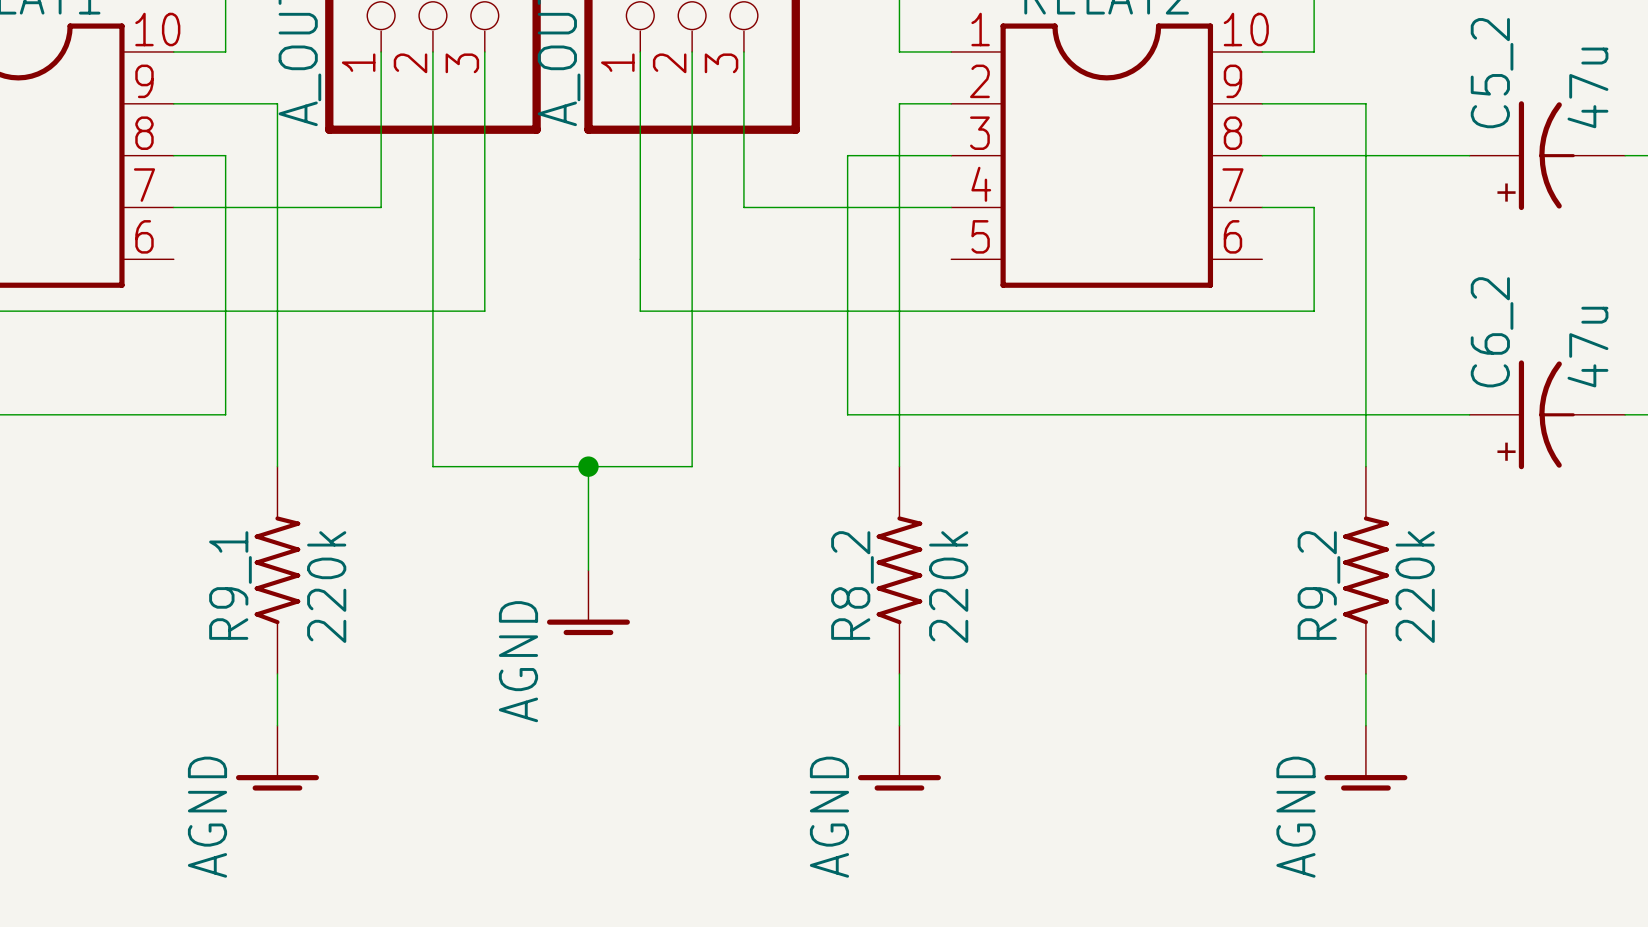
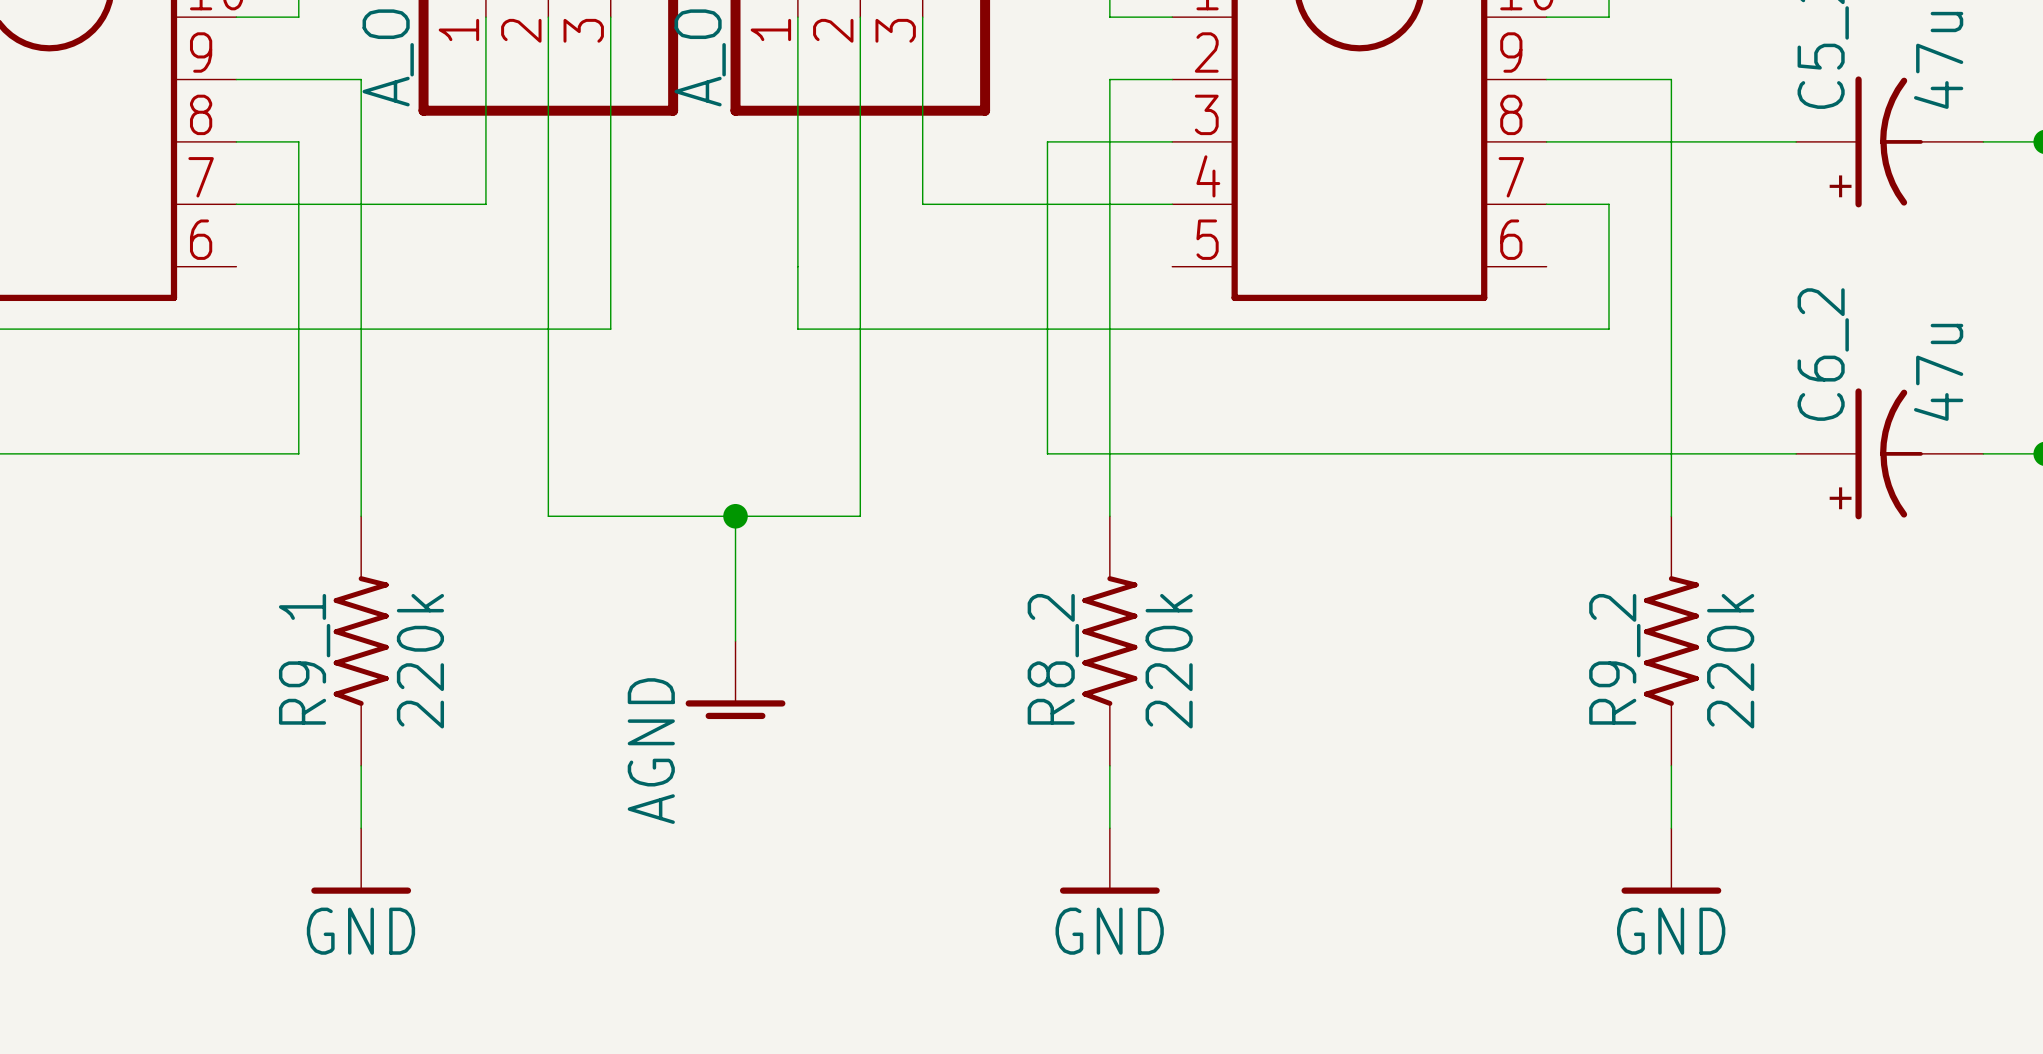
power symbol: AGND (277, 758) -> GND (361, 860)
power symbol: AGND (899, 758) -> GND (1109, 860)
power symbol: AGND (1365, 758) -> GND (1671, 860)

